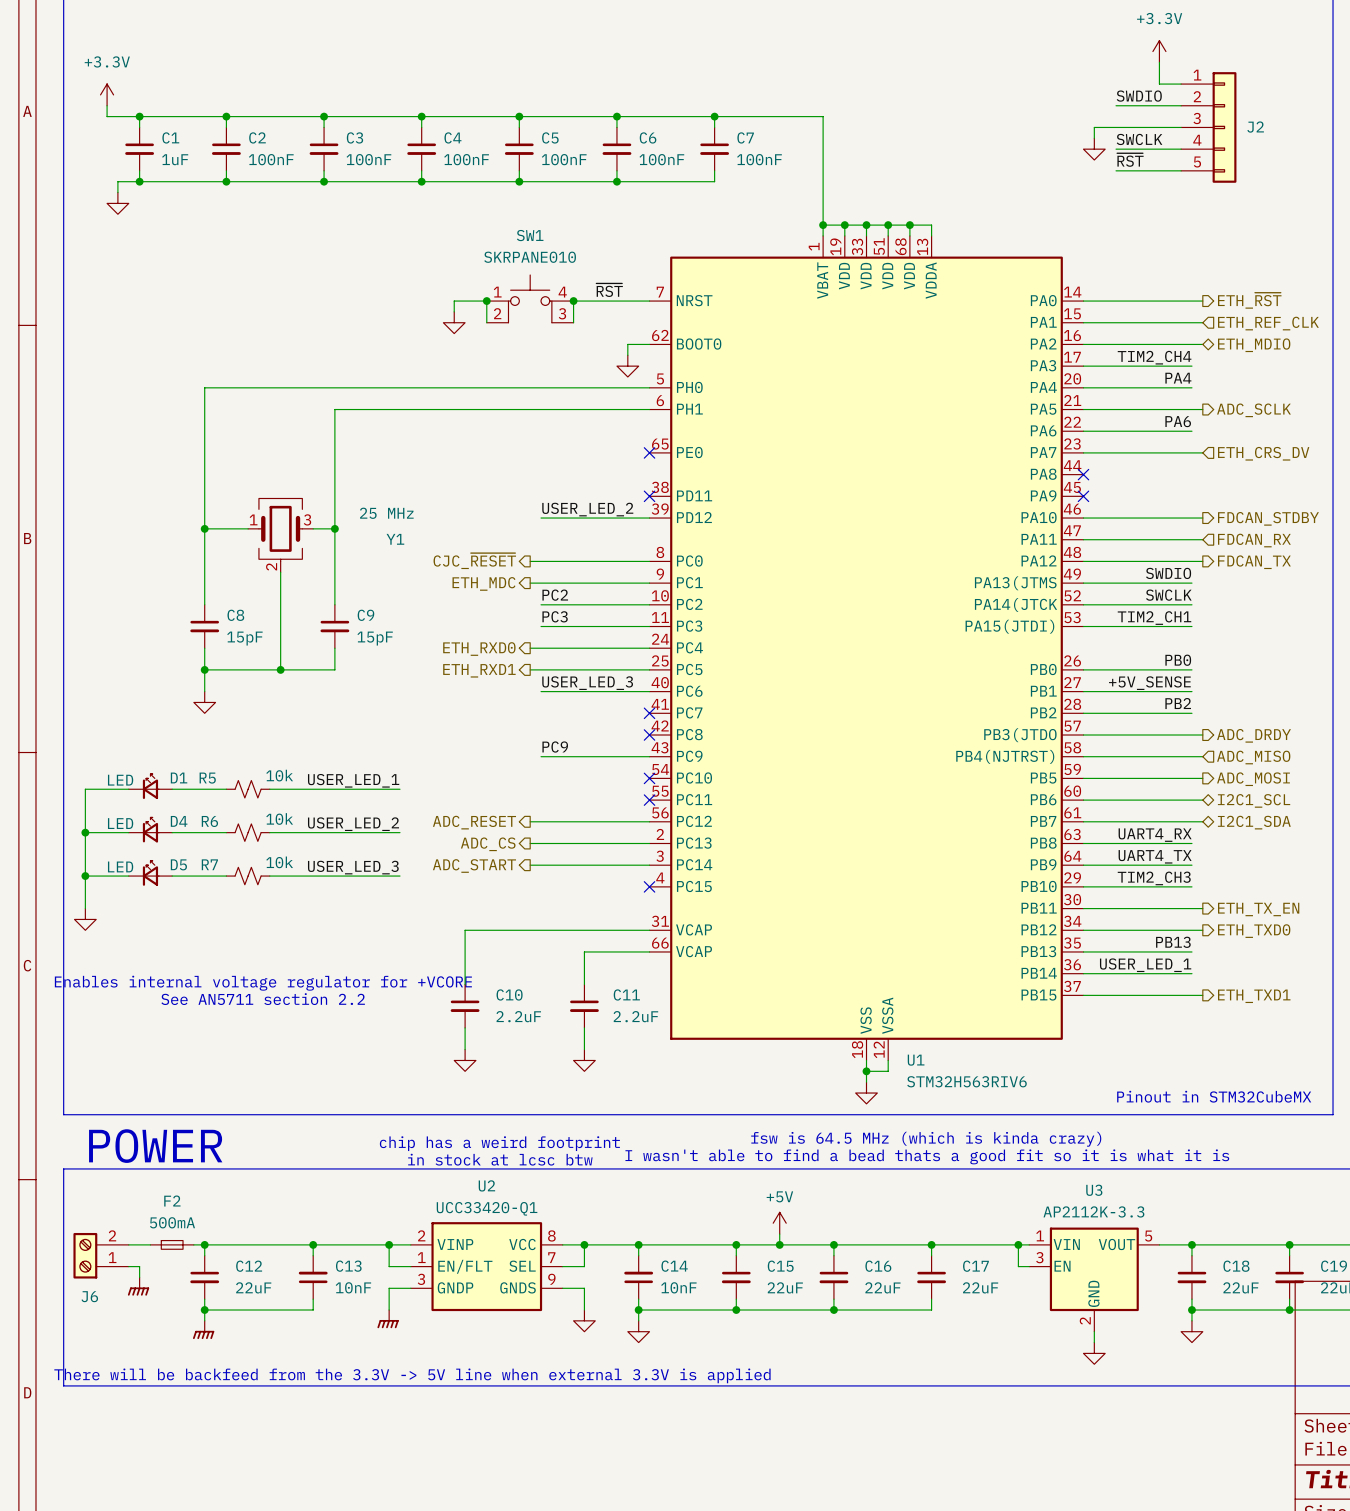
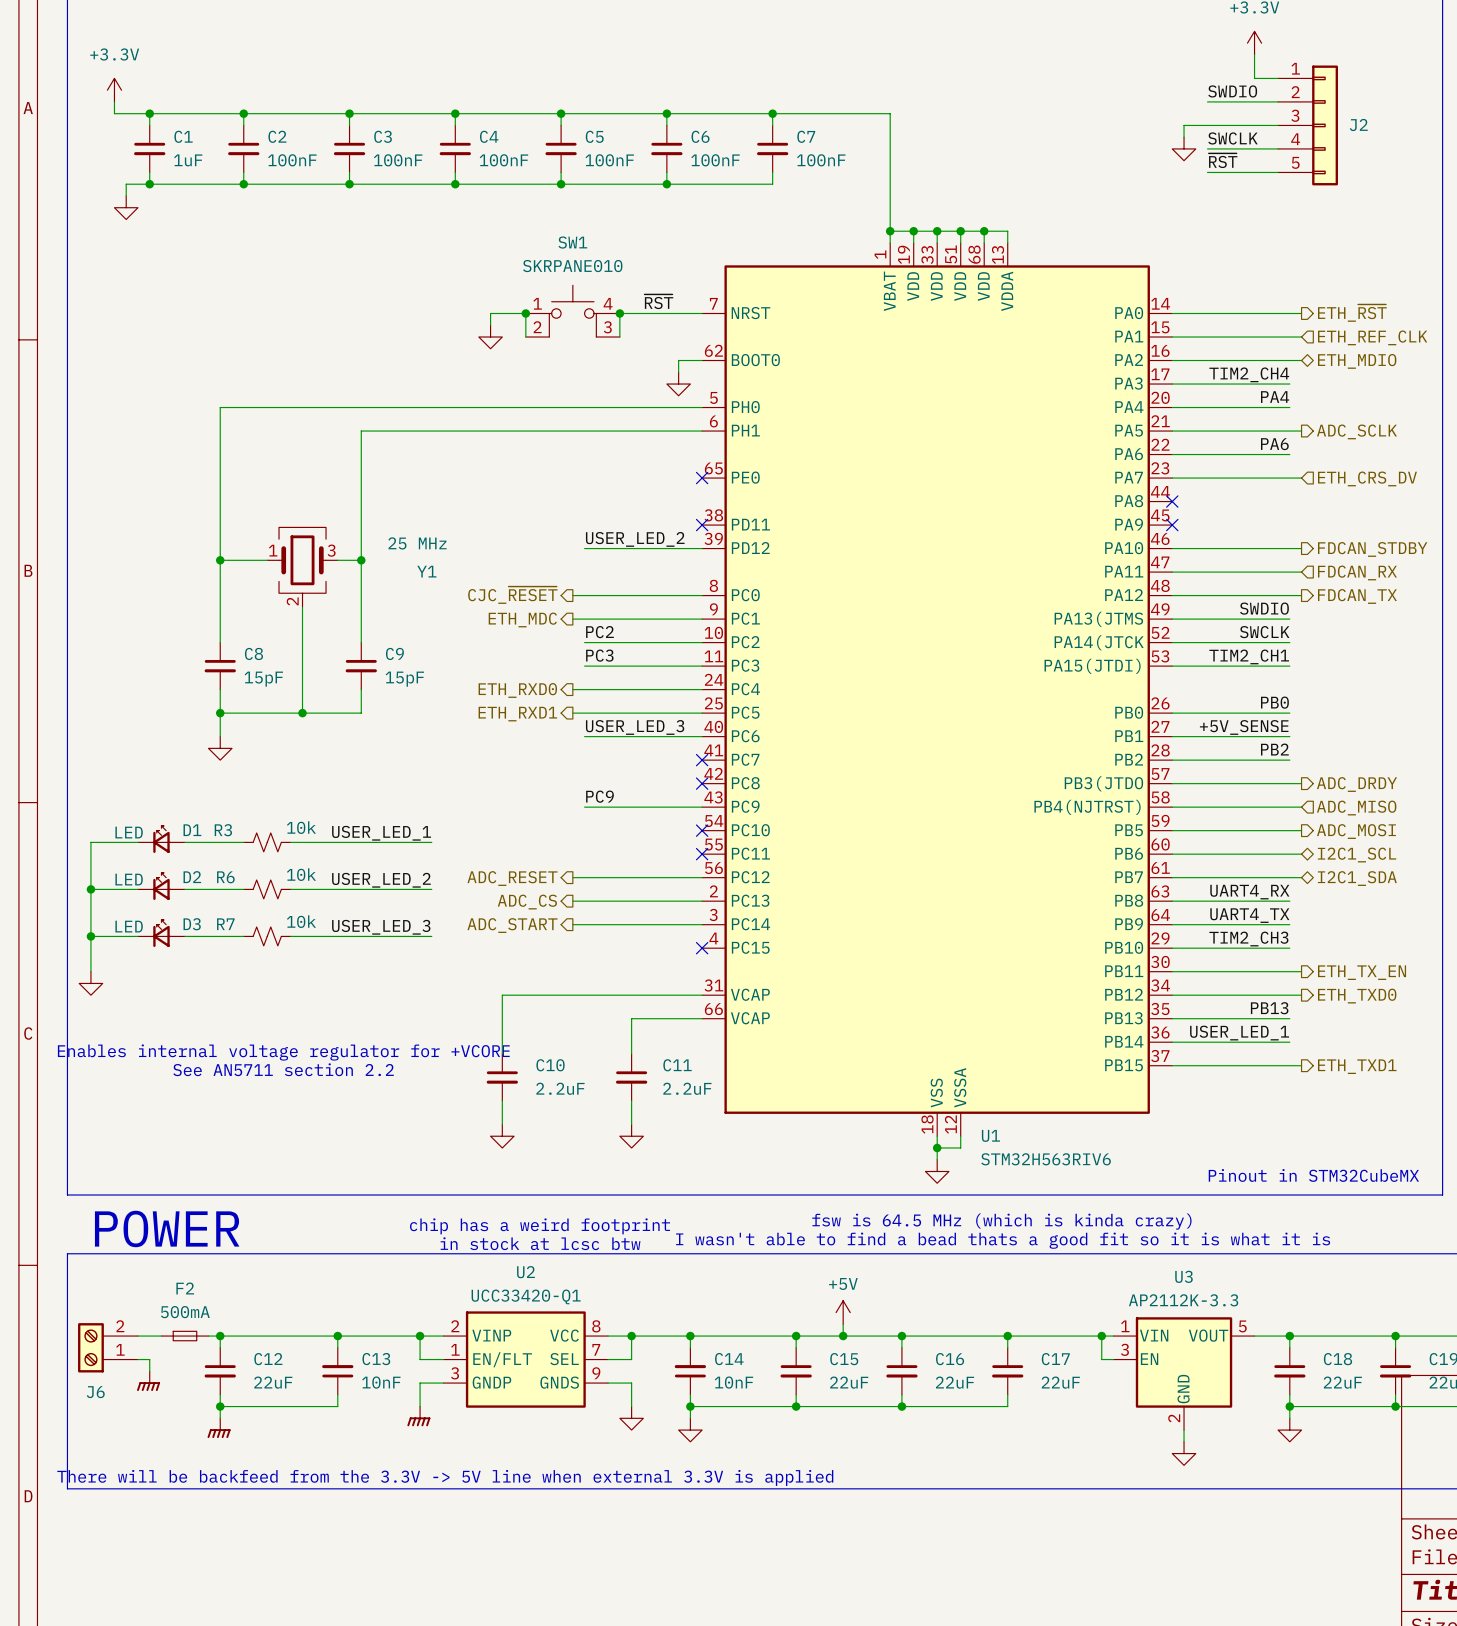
R5 name: R5 (207, 778) -> R3 (223, 830)
D4 name: D4 (179, 821) -> D2 (192, 877)
D5 name: D5 (178, 864) -> D3 (192, 924)

